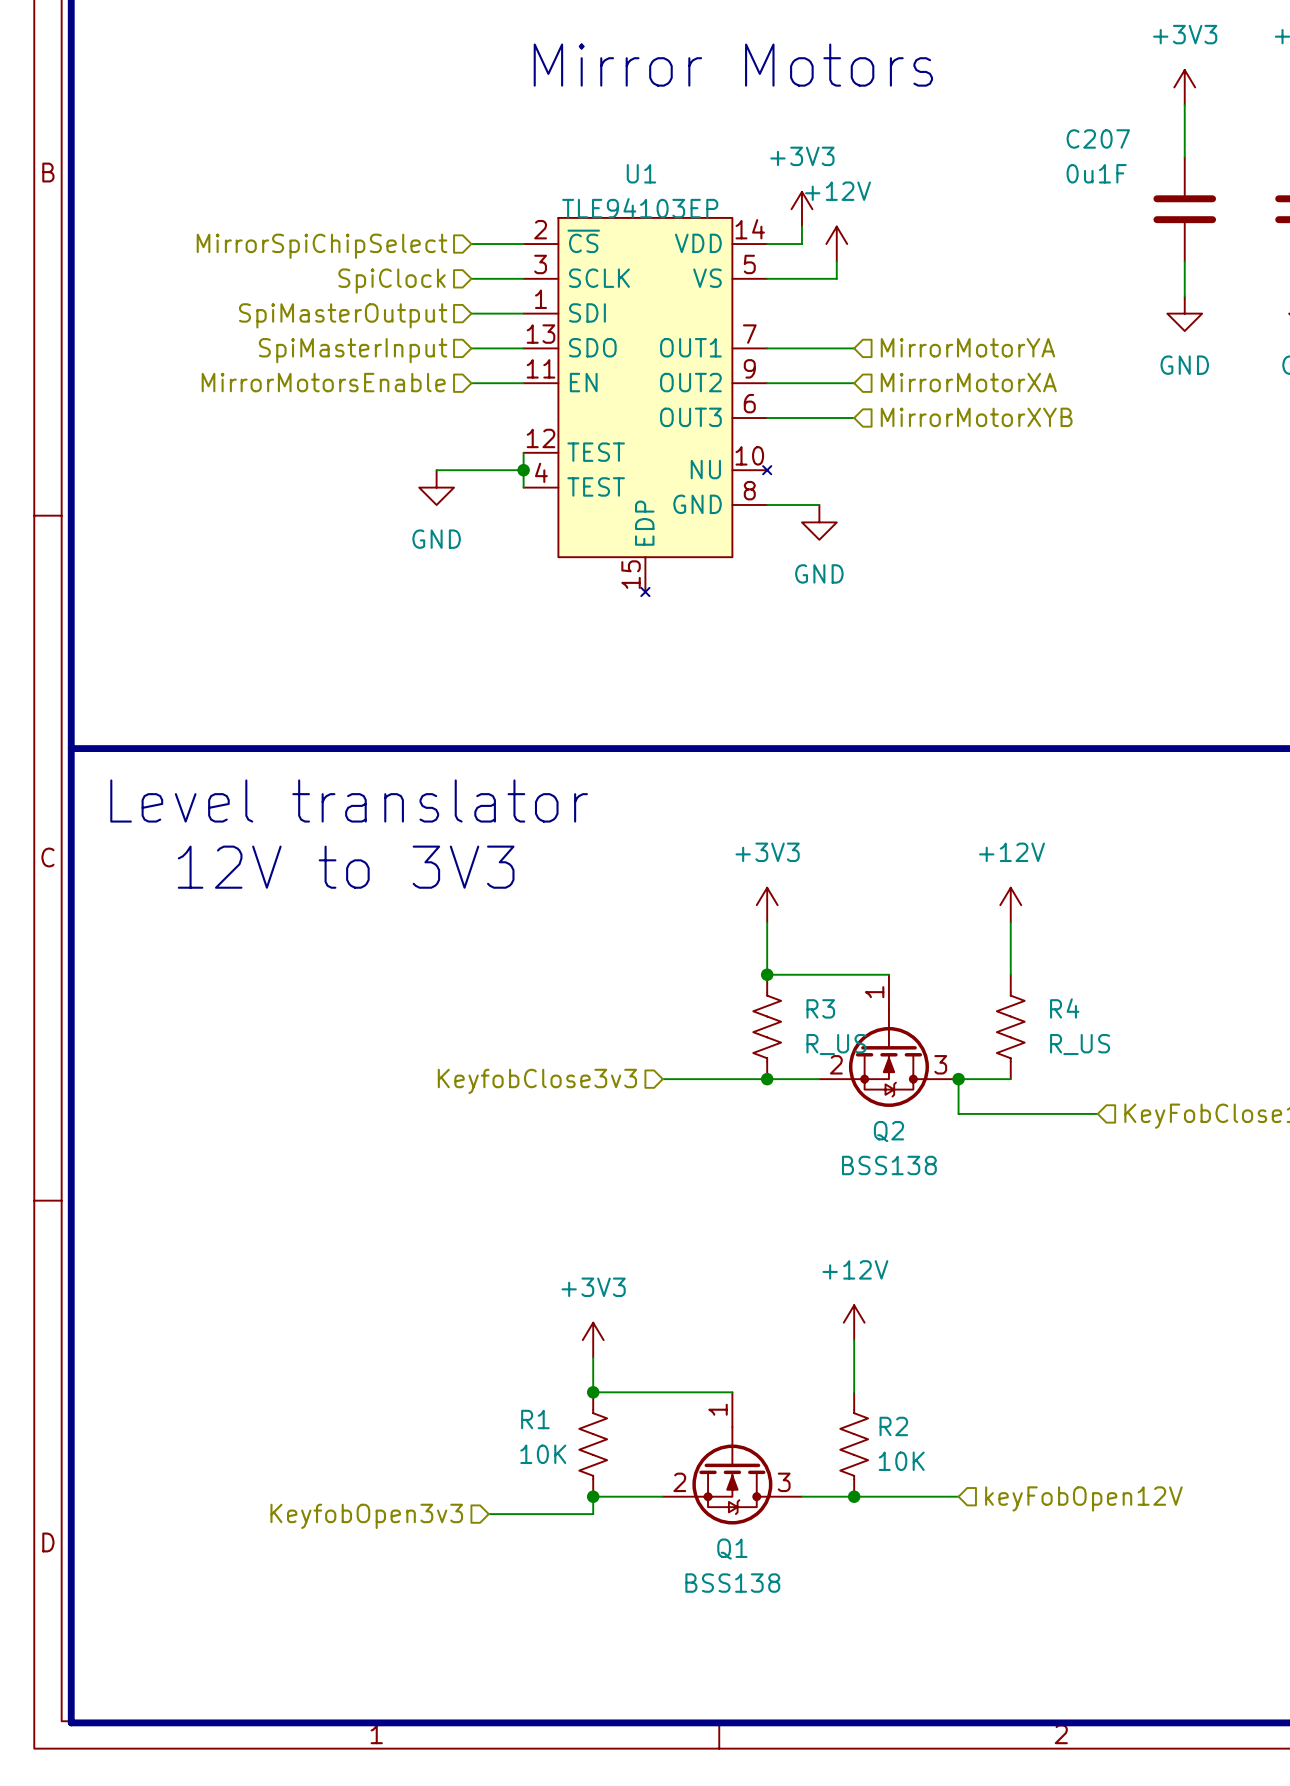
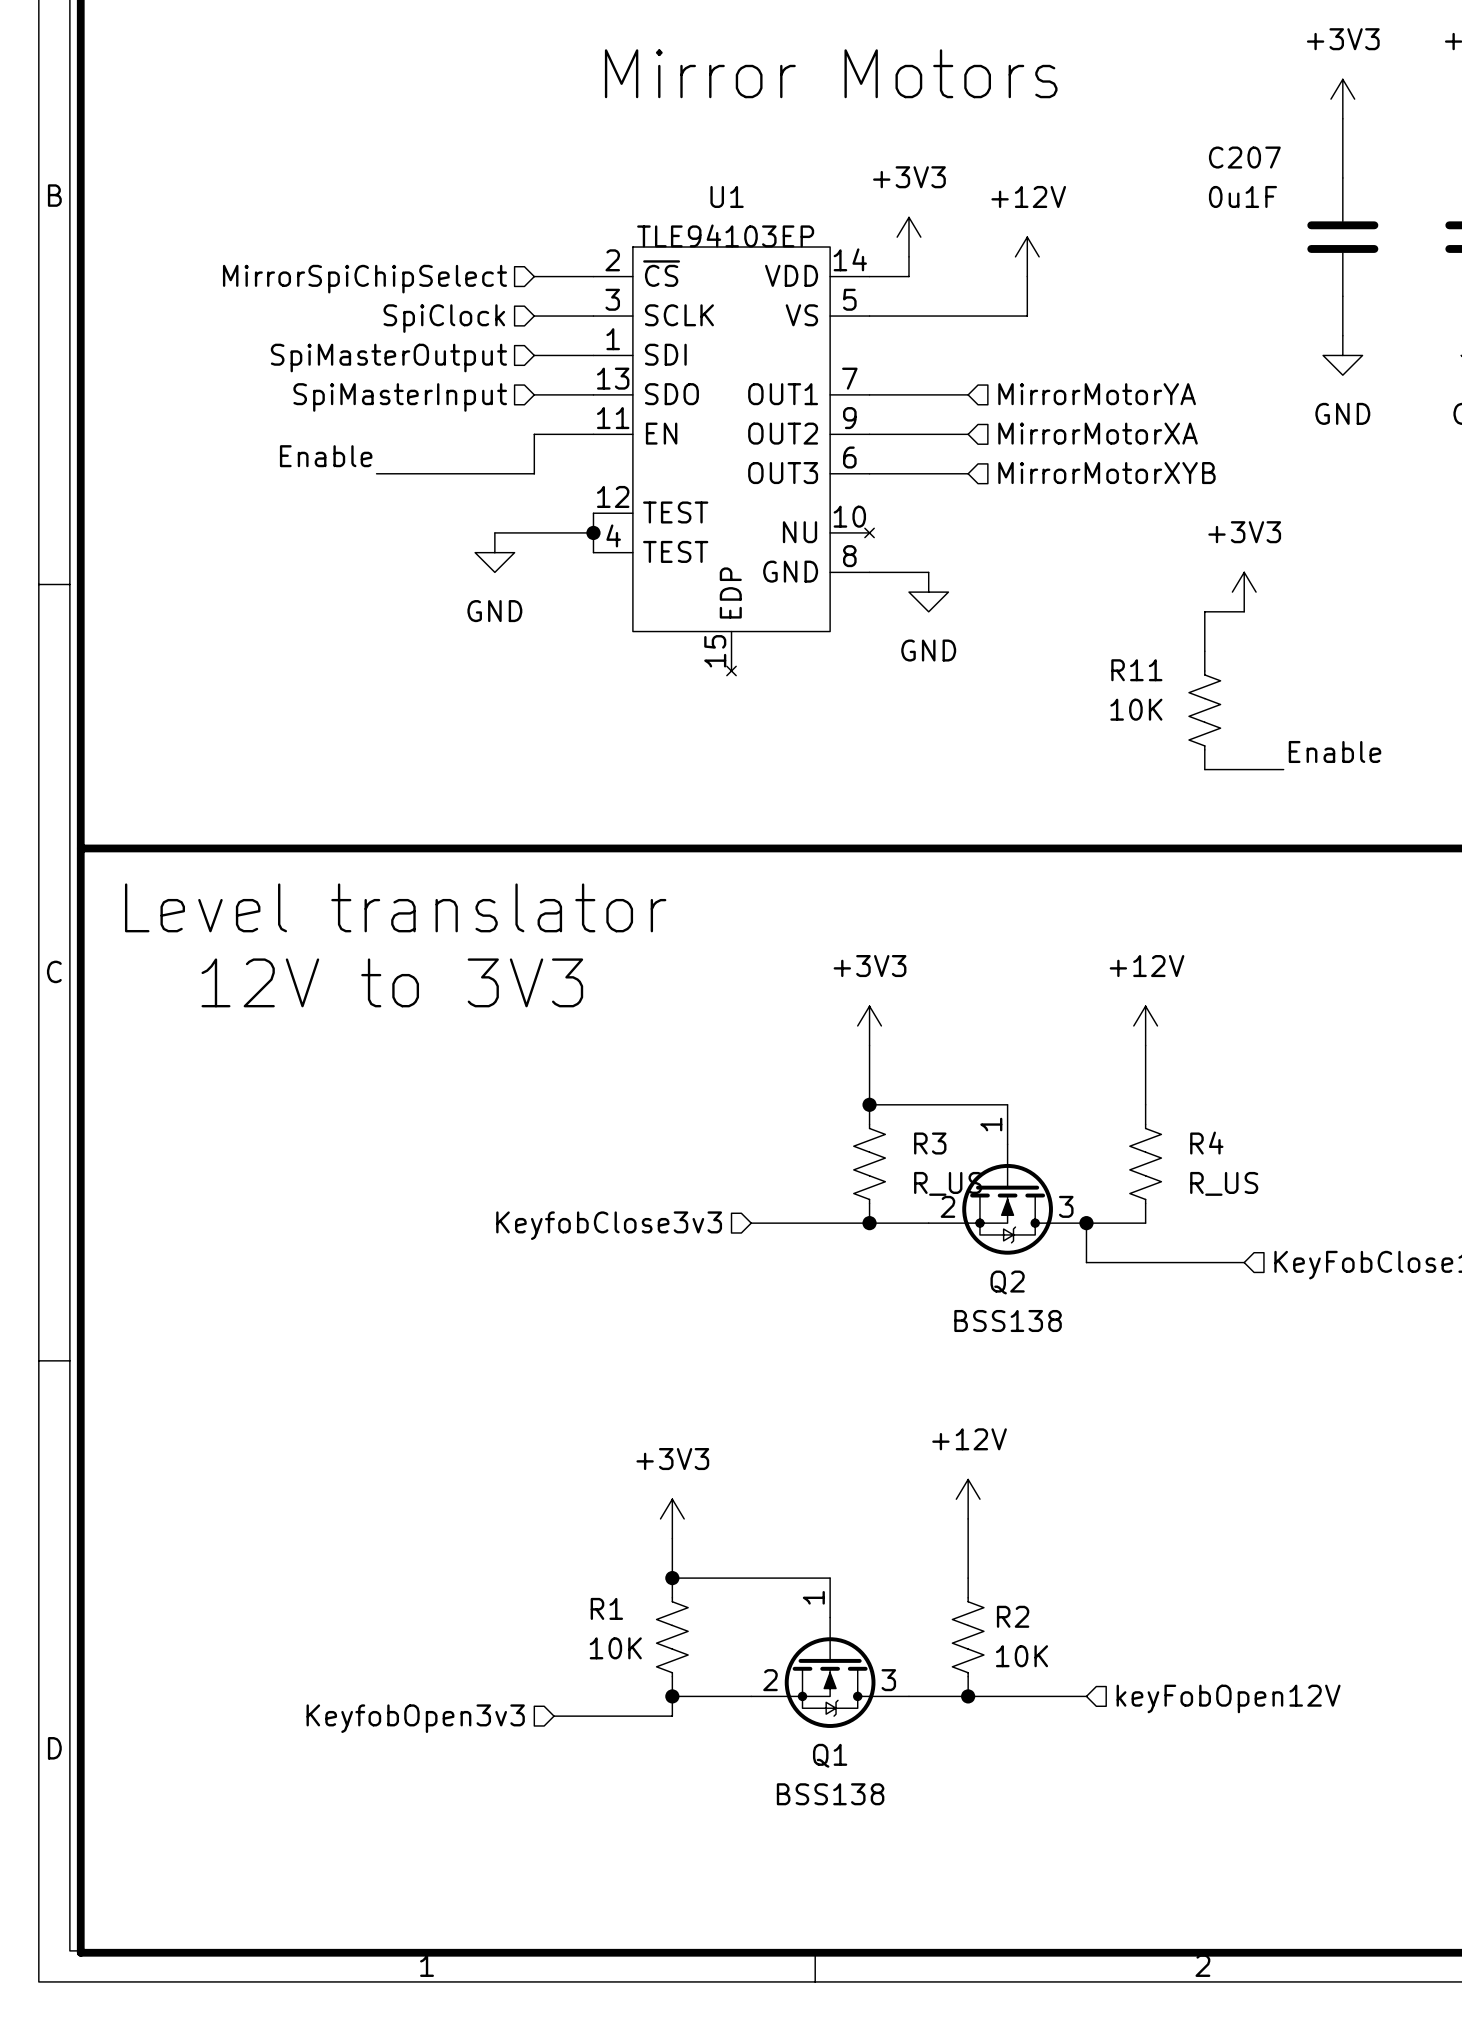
power symbol position: +12V (836, 244) -> +12V (1027, 256)
wire: (836, 261) (836, 278) -> (1027, 276) (1027, 316) (948, 316)
hierarchical label: MirrorMotorsEnable (323, 382) -> none
wire: none -> (534, 434) (534, 473) (376, 473)
label: none -> Enable (326, 456)
power symbol: none -> +3V3 (1244, 592)
wire: none -> (1244, 611) (1204, 611) (1204, 651)
R11: none -> 10K (1204, 710)
label: none -> Enable (1334, 751)
wire: none -> (1204, 769) (1283, 769)

